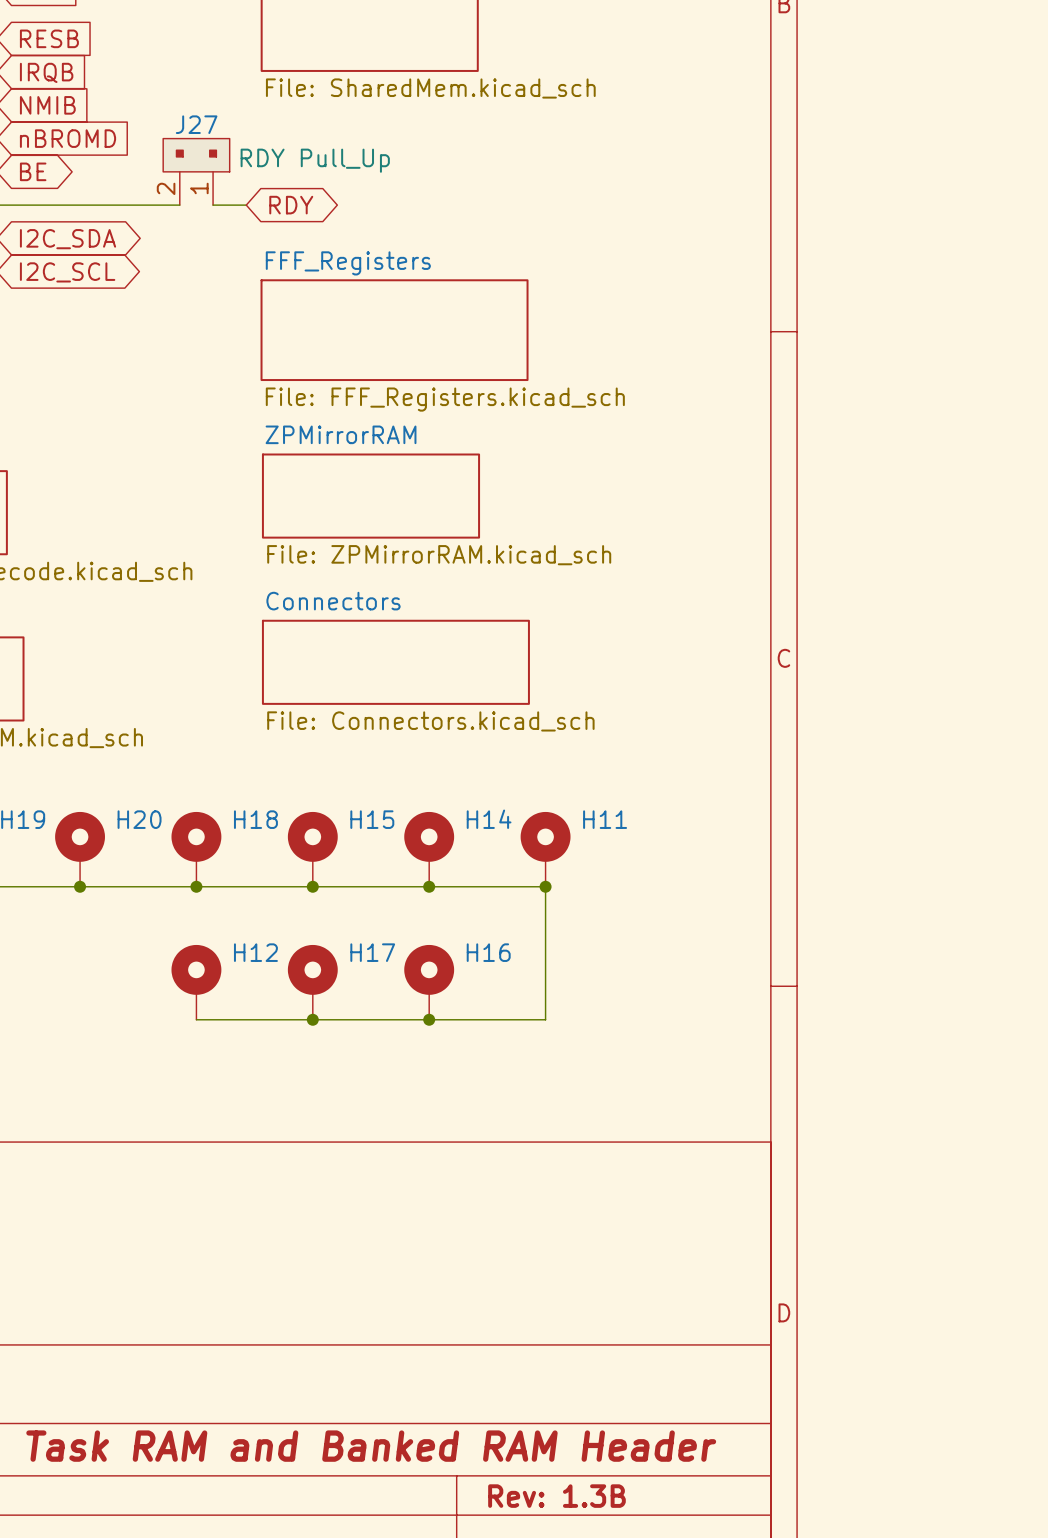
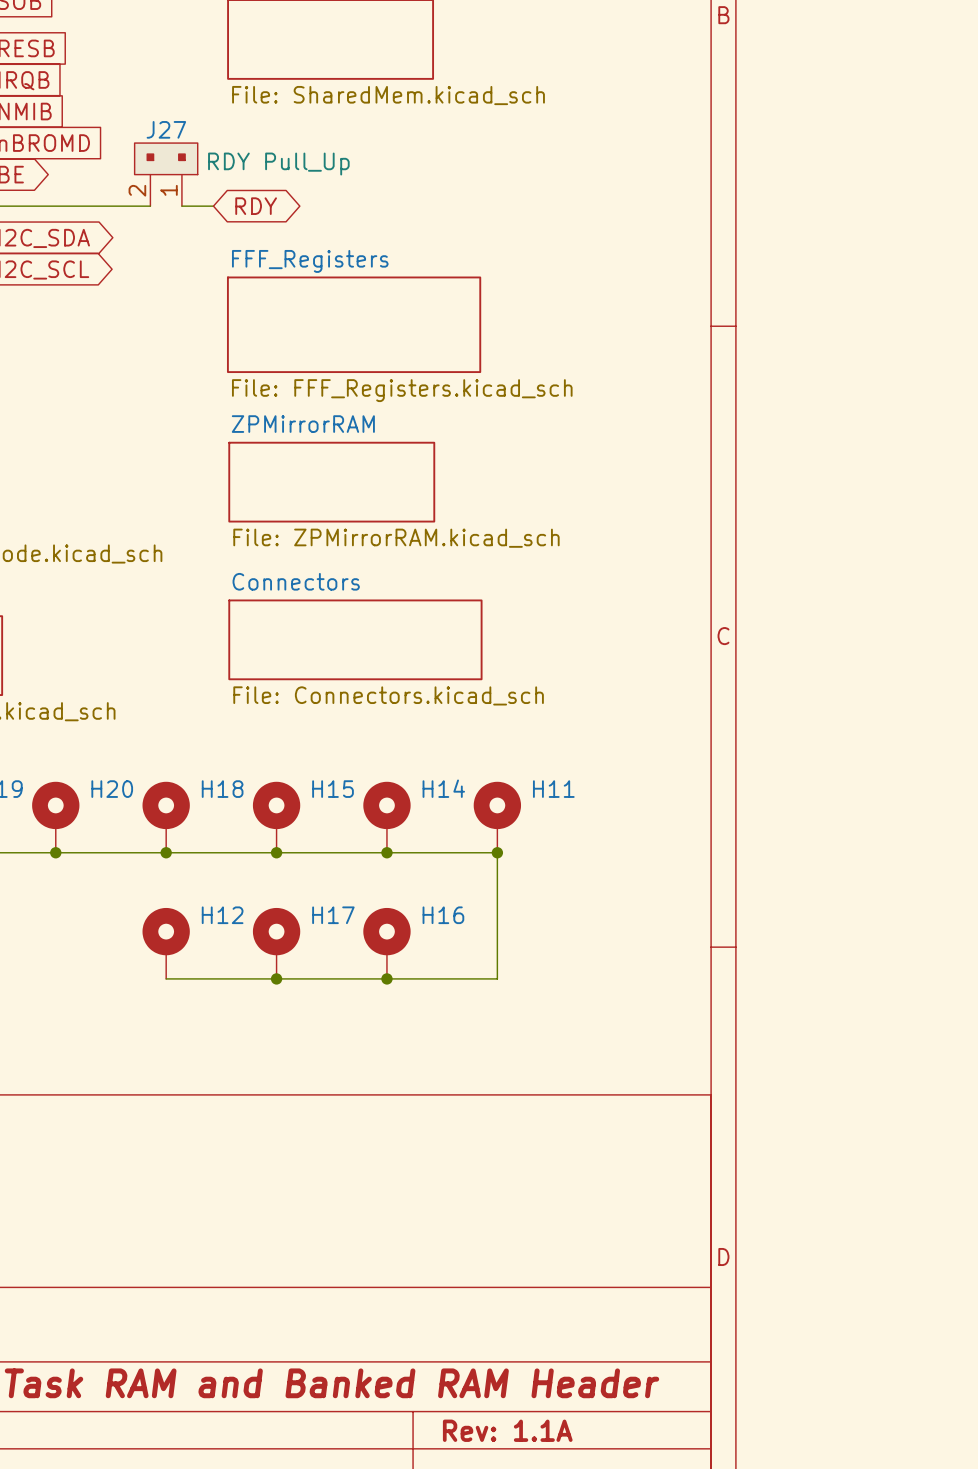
title block: Rev: 1.3B (556, 1496) -> Rev: 1.1A (507, 1430)

